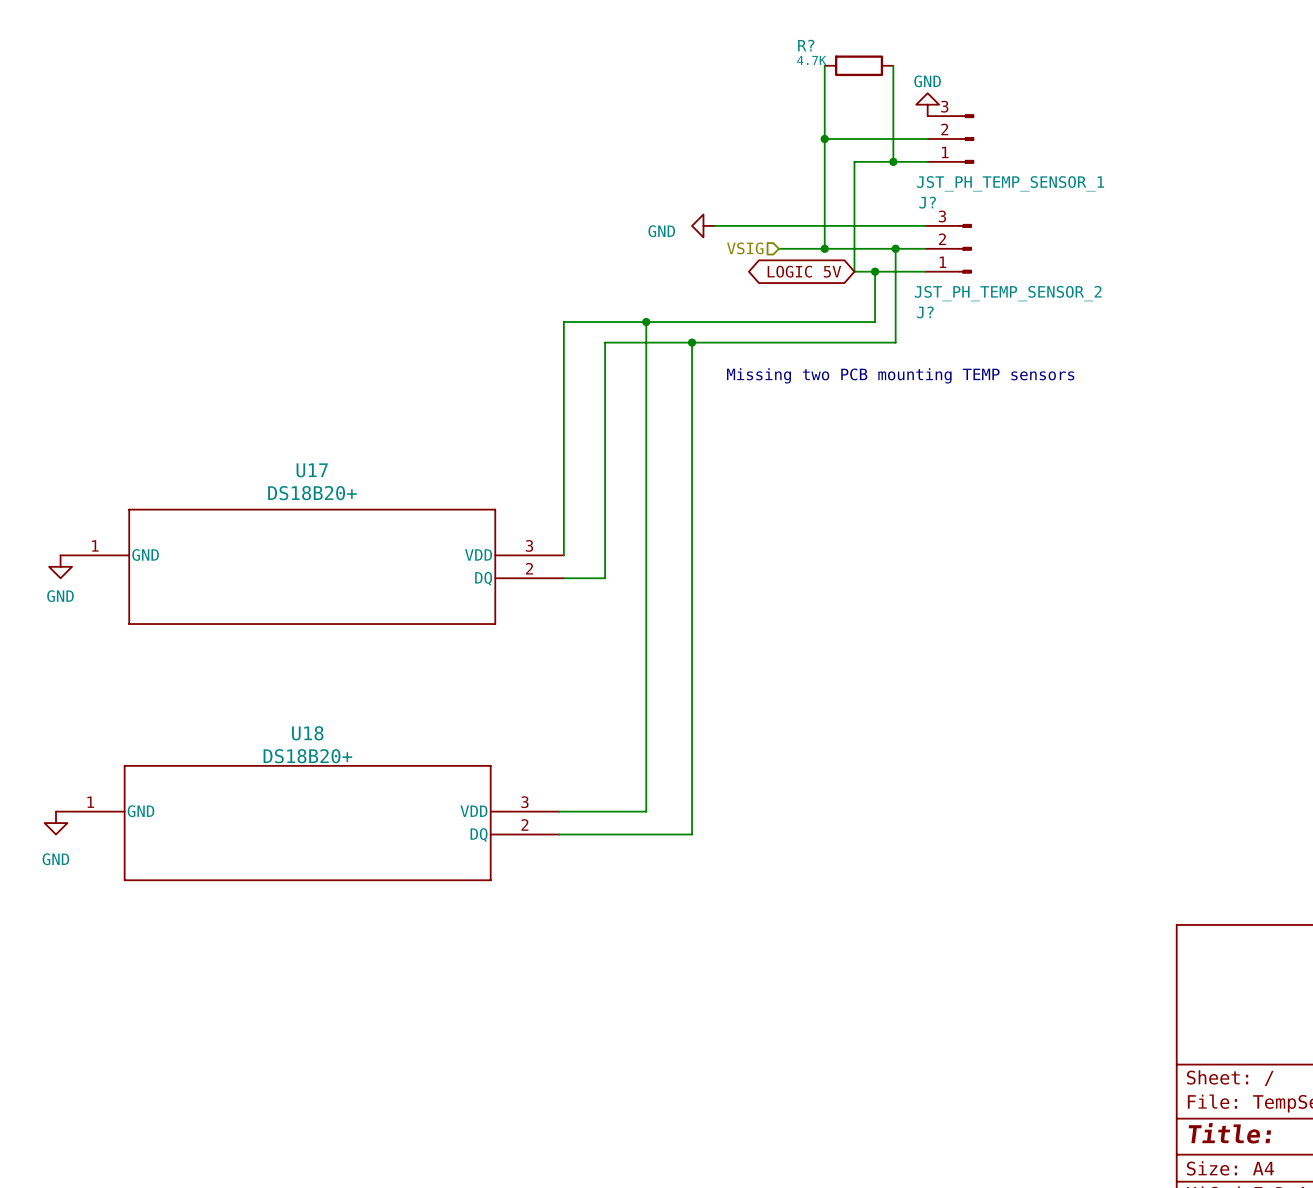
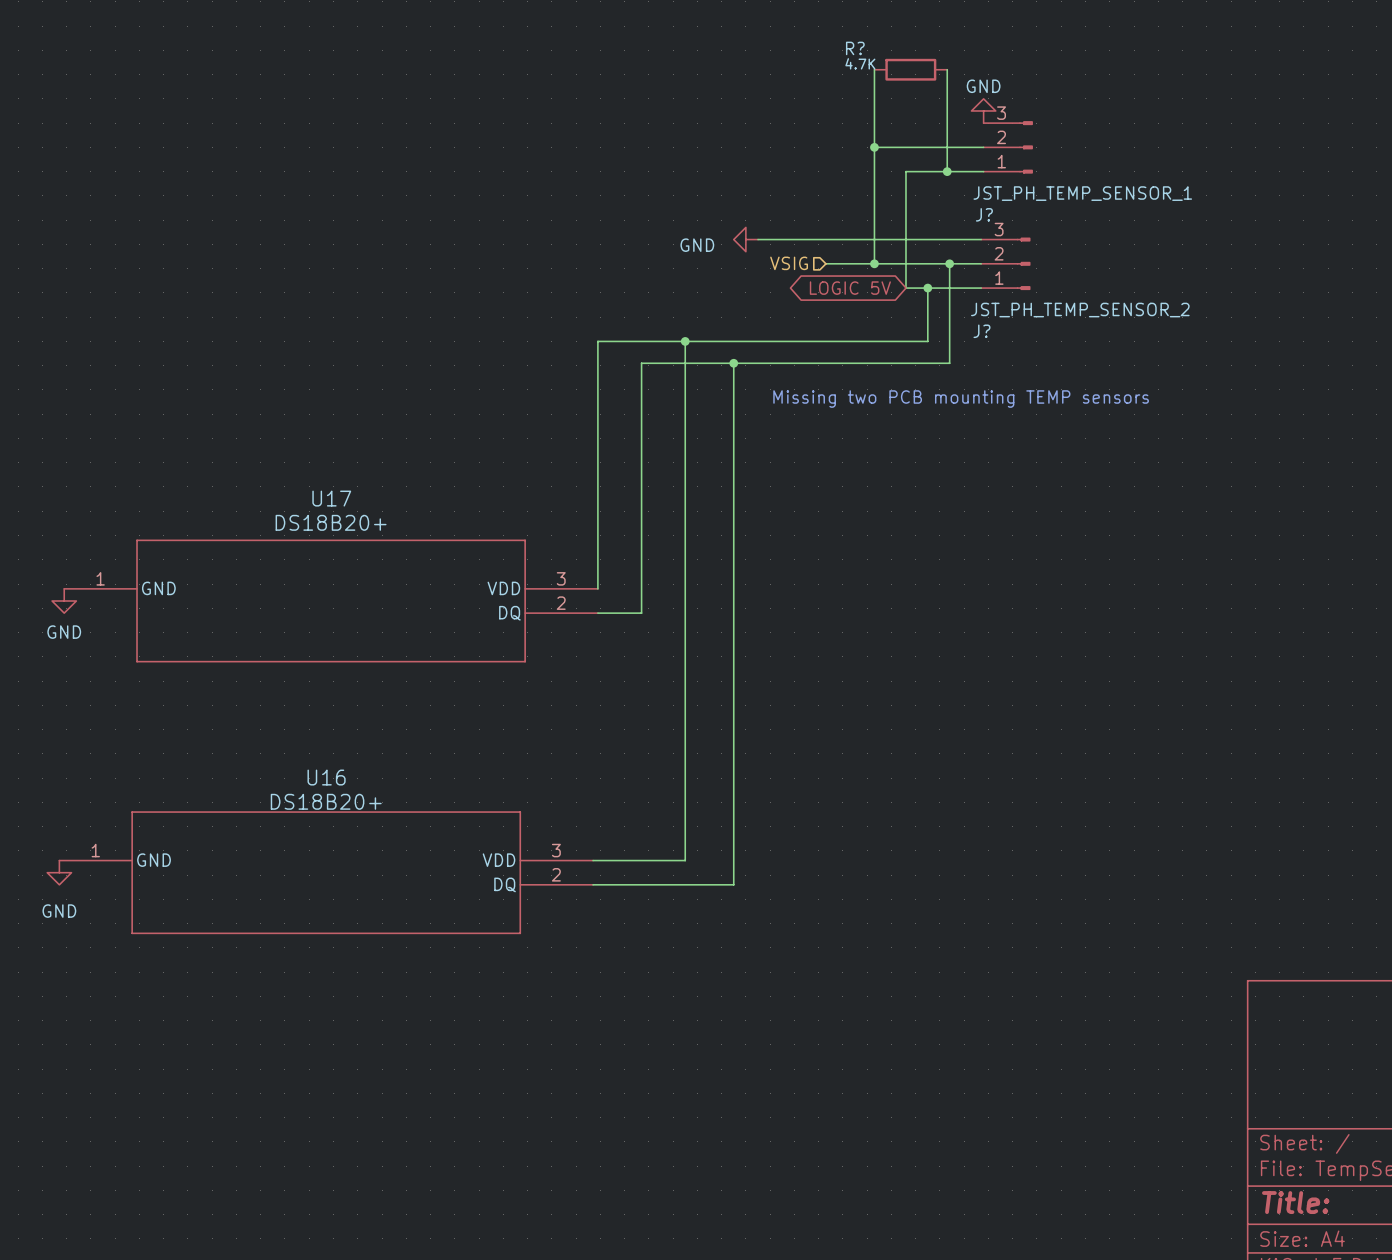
U18 name: U18 (307, 733) -> U16 (326, 777)

